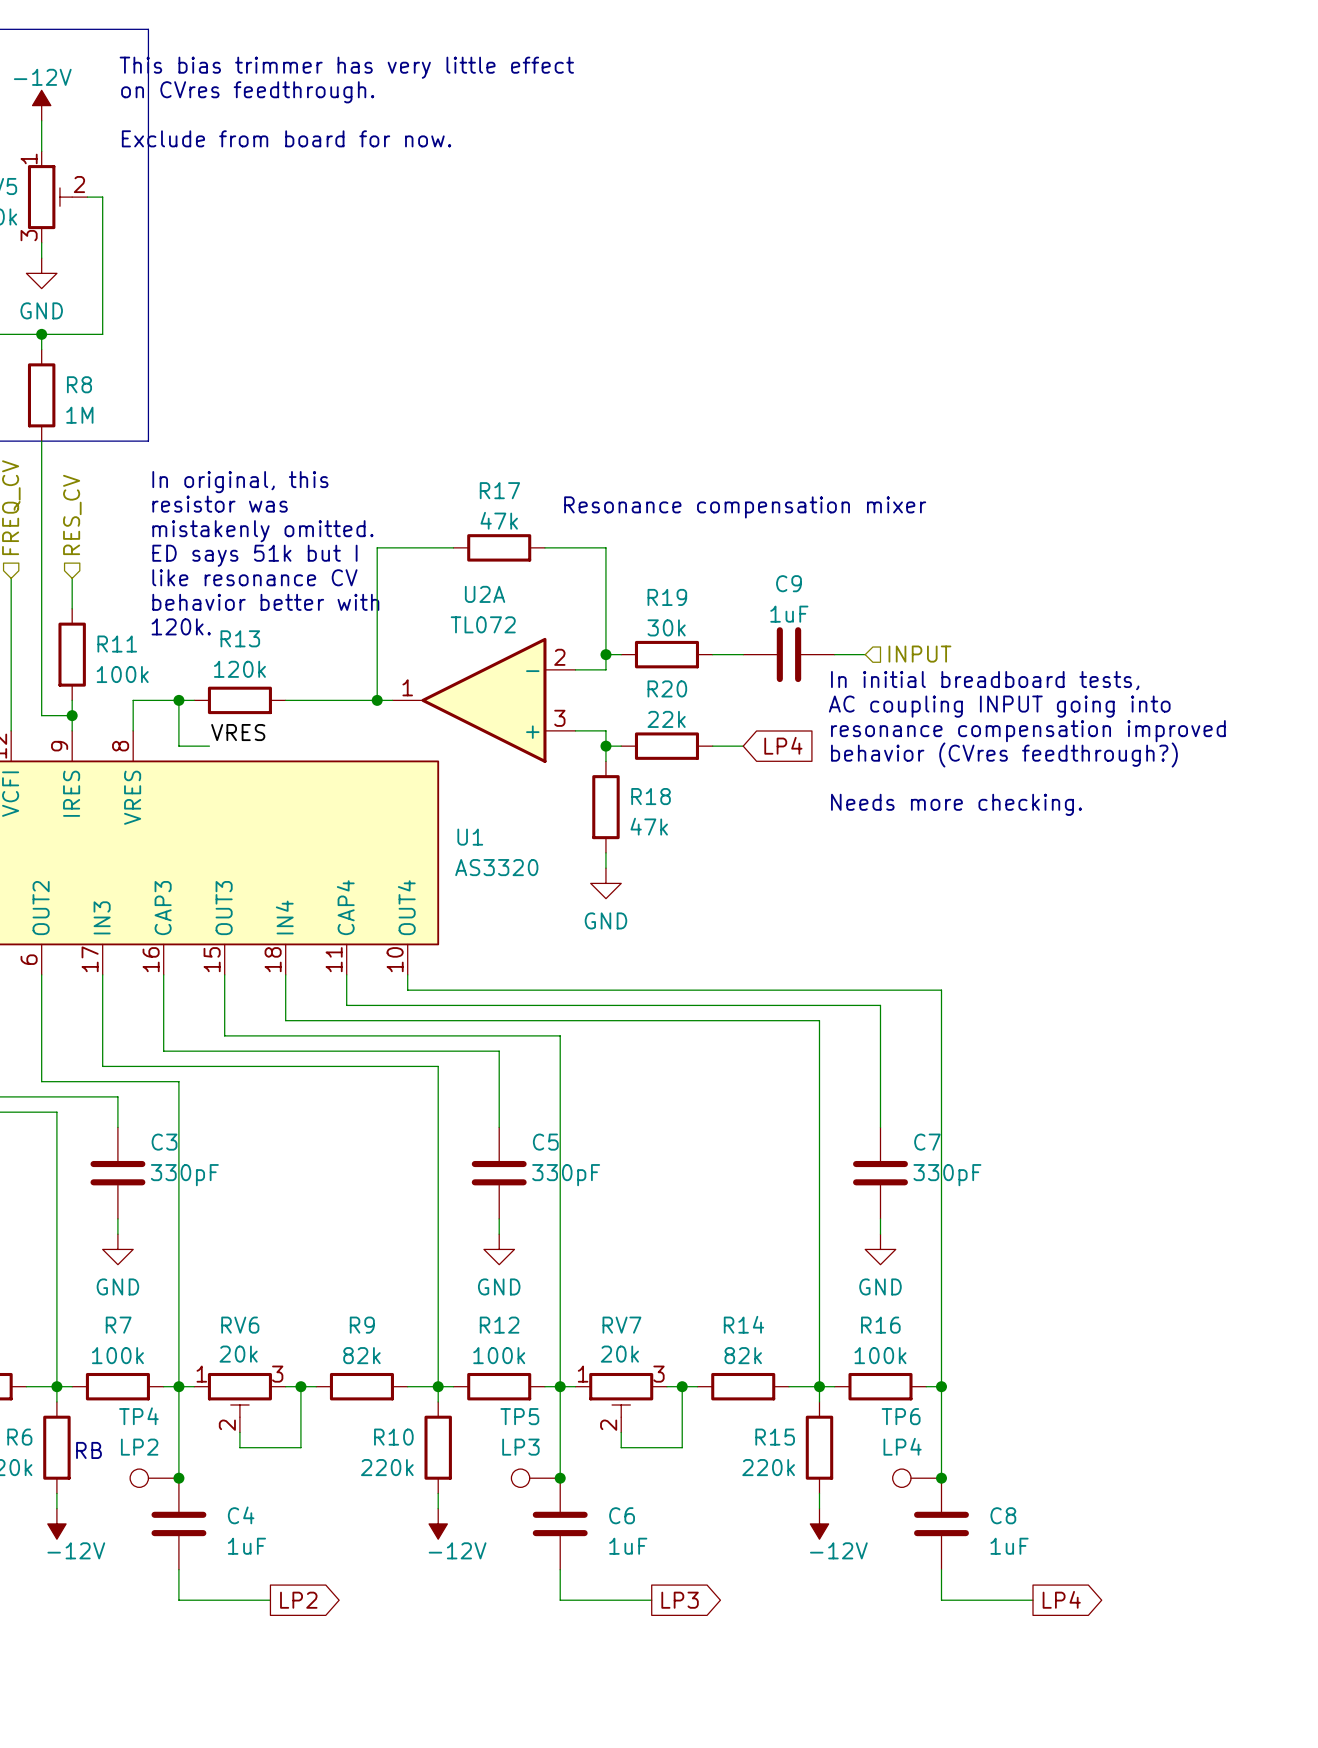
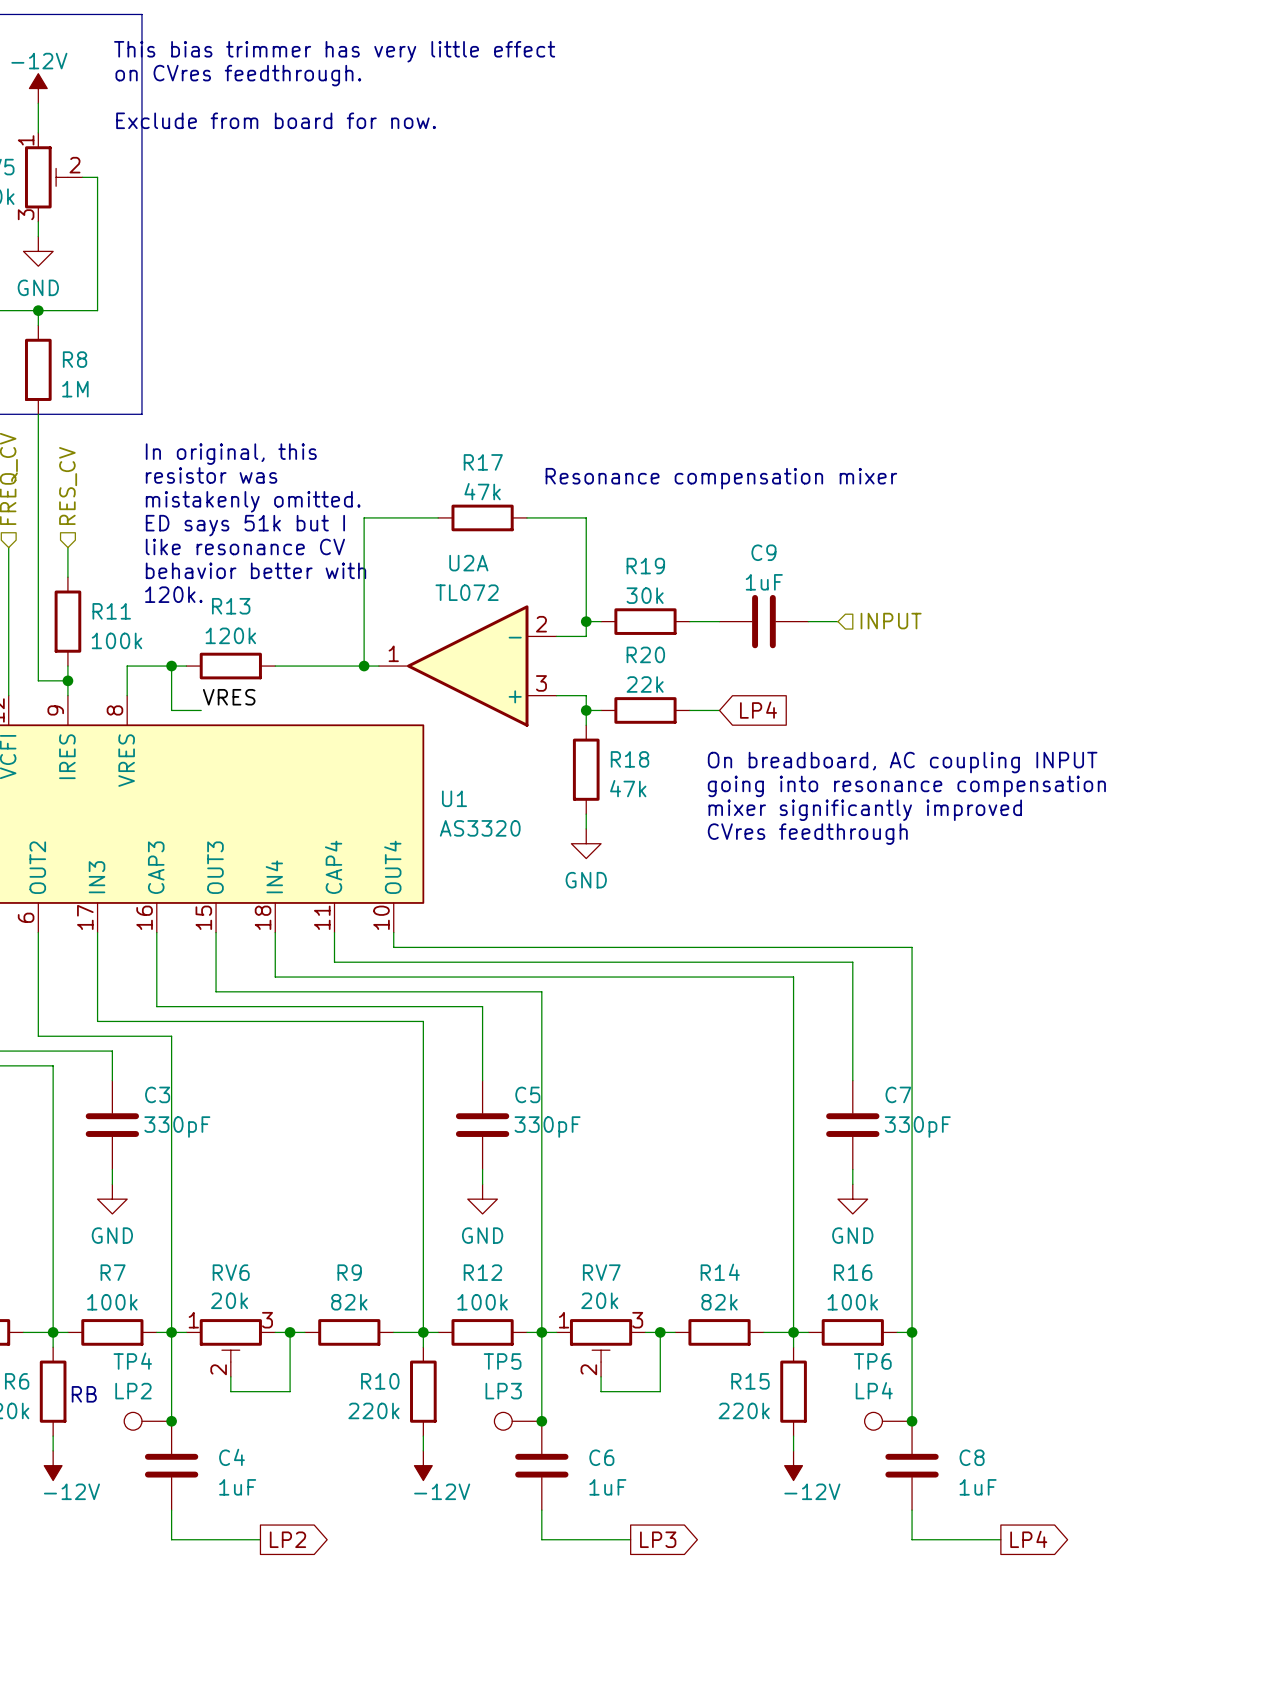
text: In initial breadboard tests, (985, 680) -> none
text: AC coupling INPUT going into (999, 706) -> none
text: resonance compensation improved (1028, 731) -> none
text: behavior (CVres feedthrough?) (1004, 754) -> none
text: none -> On breadboard, AC coupling INPUT (902, 762)
text: Needs more checking. (956, 804) -> none
text: none -> going into resonance compensation (906, 786)
text: none -> mixer significantly improved (865, 810)
text: none -> CVres feedthrough (807, 834)

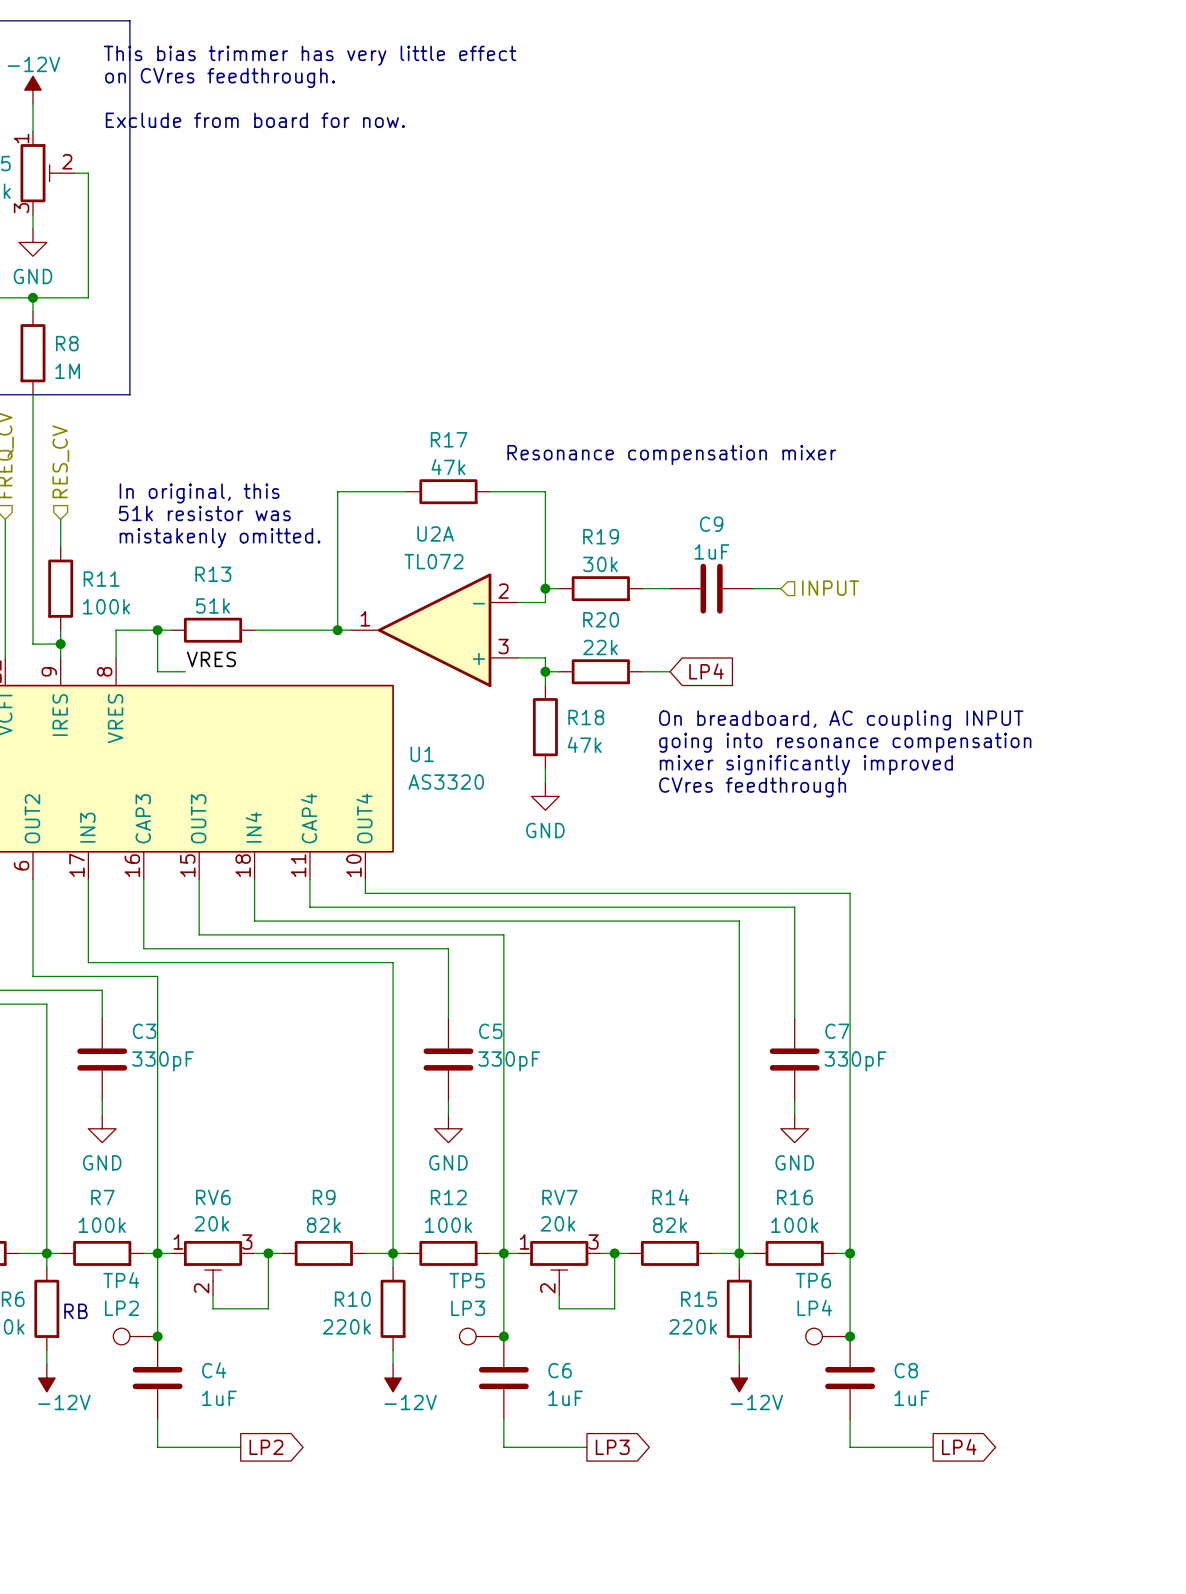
text position: In original, this (231, 454) -> In original, this (199, 493)
text: resistor was (211, 475) -> none
text position: mistakenly omitted. (253, 501) -> mistakenly omitted. (220, 538)
text: ED says 51k but I (245, 525) -> none
text: none -> 51k resistor was (204, 513)
text: like resonance CV (245, 546) -> none
text: behavior better with (255, 570) -> none
text: 120k. (173, 594) -> none
R13 value: 120k (230, 635) -> 51k (213, 605)

